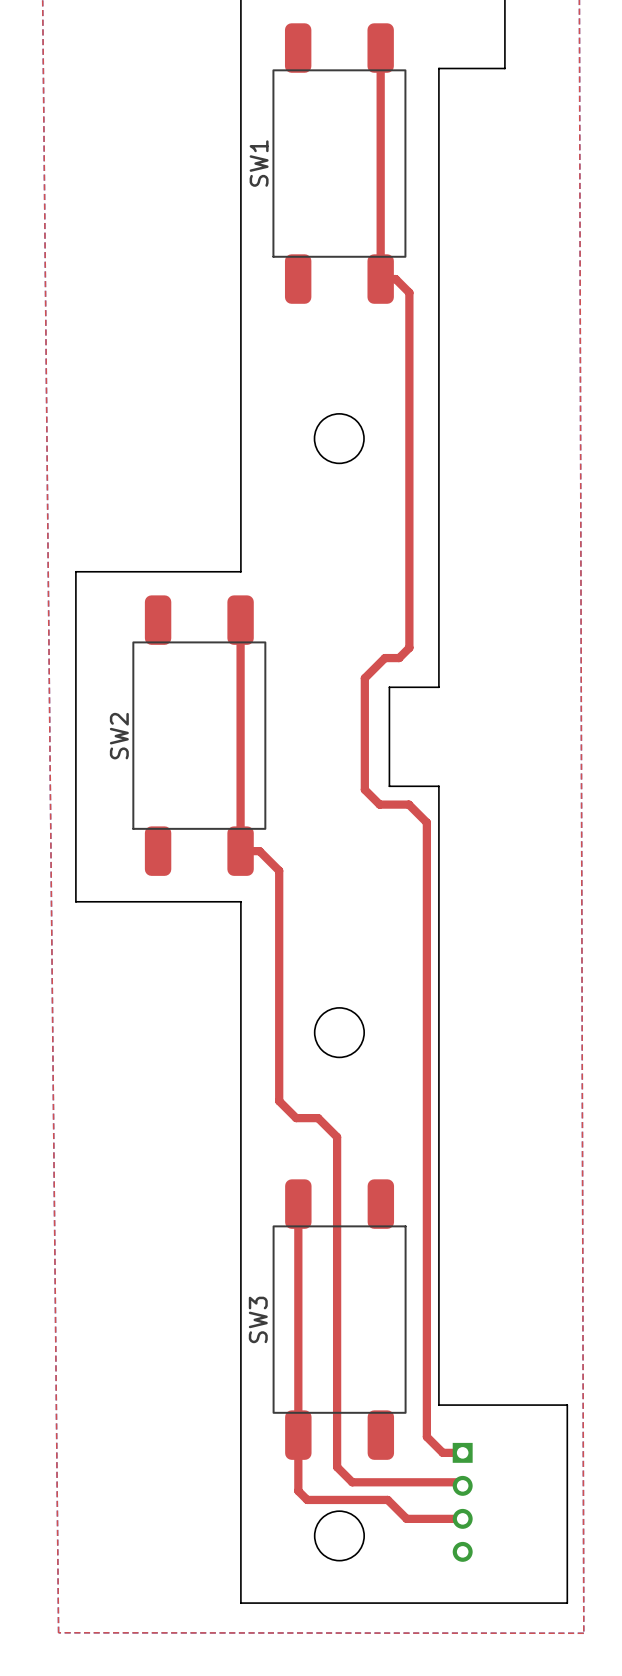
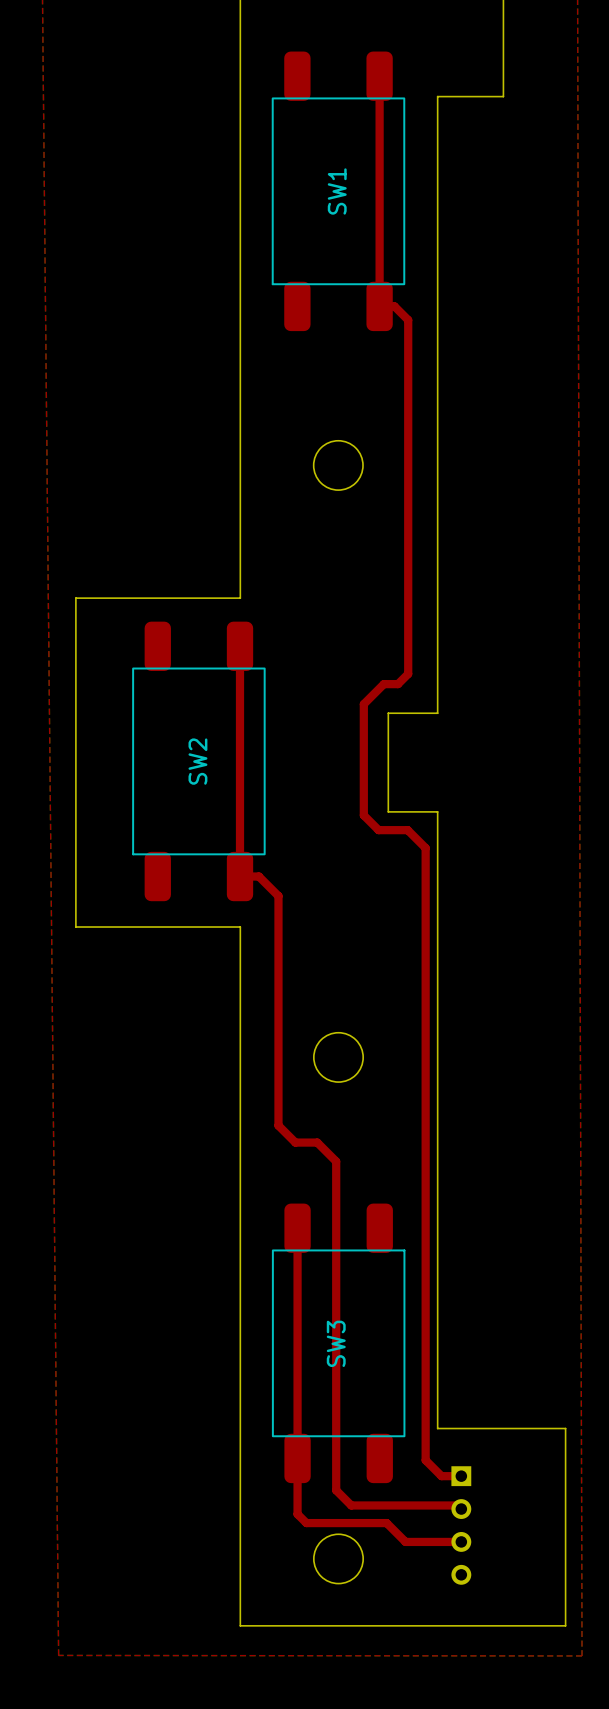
SW1 name position: SW1 (259, 163) -> SW1 (337, 191)
SW2 name position: SW2 (119, 736) -> SW2 (197, 761)
SW3 name position: SW3 (258, 1319) -> SW3 (336, 1343)

